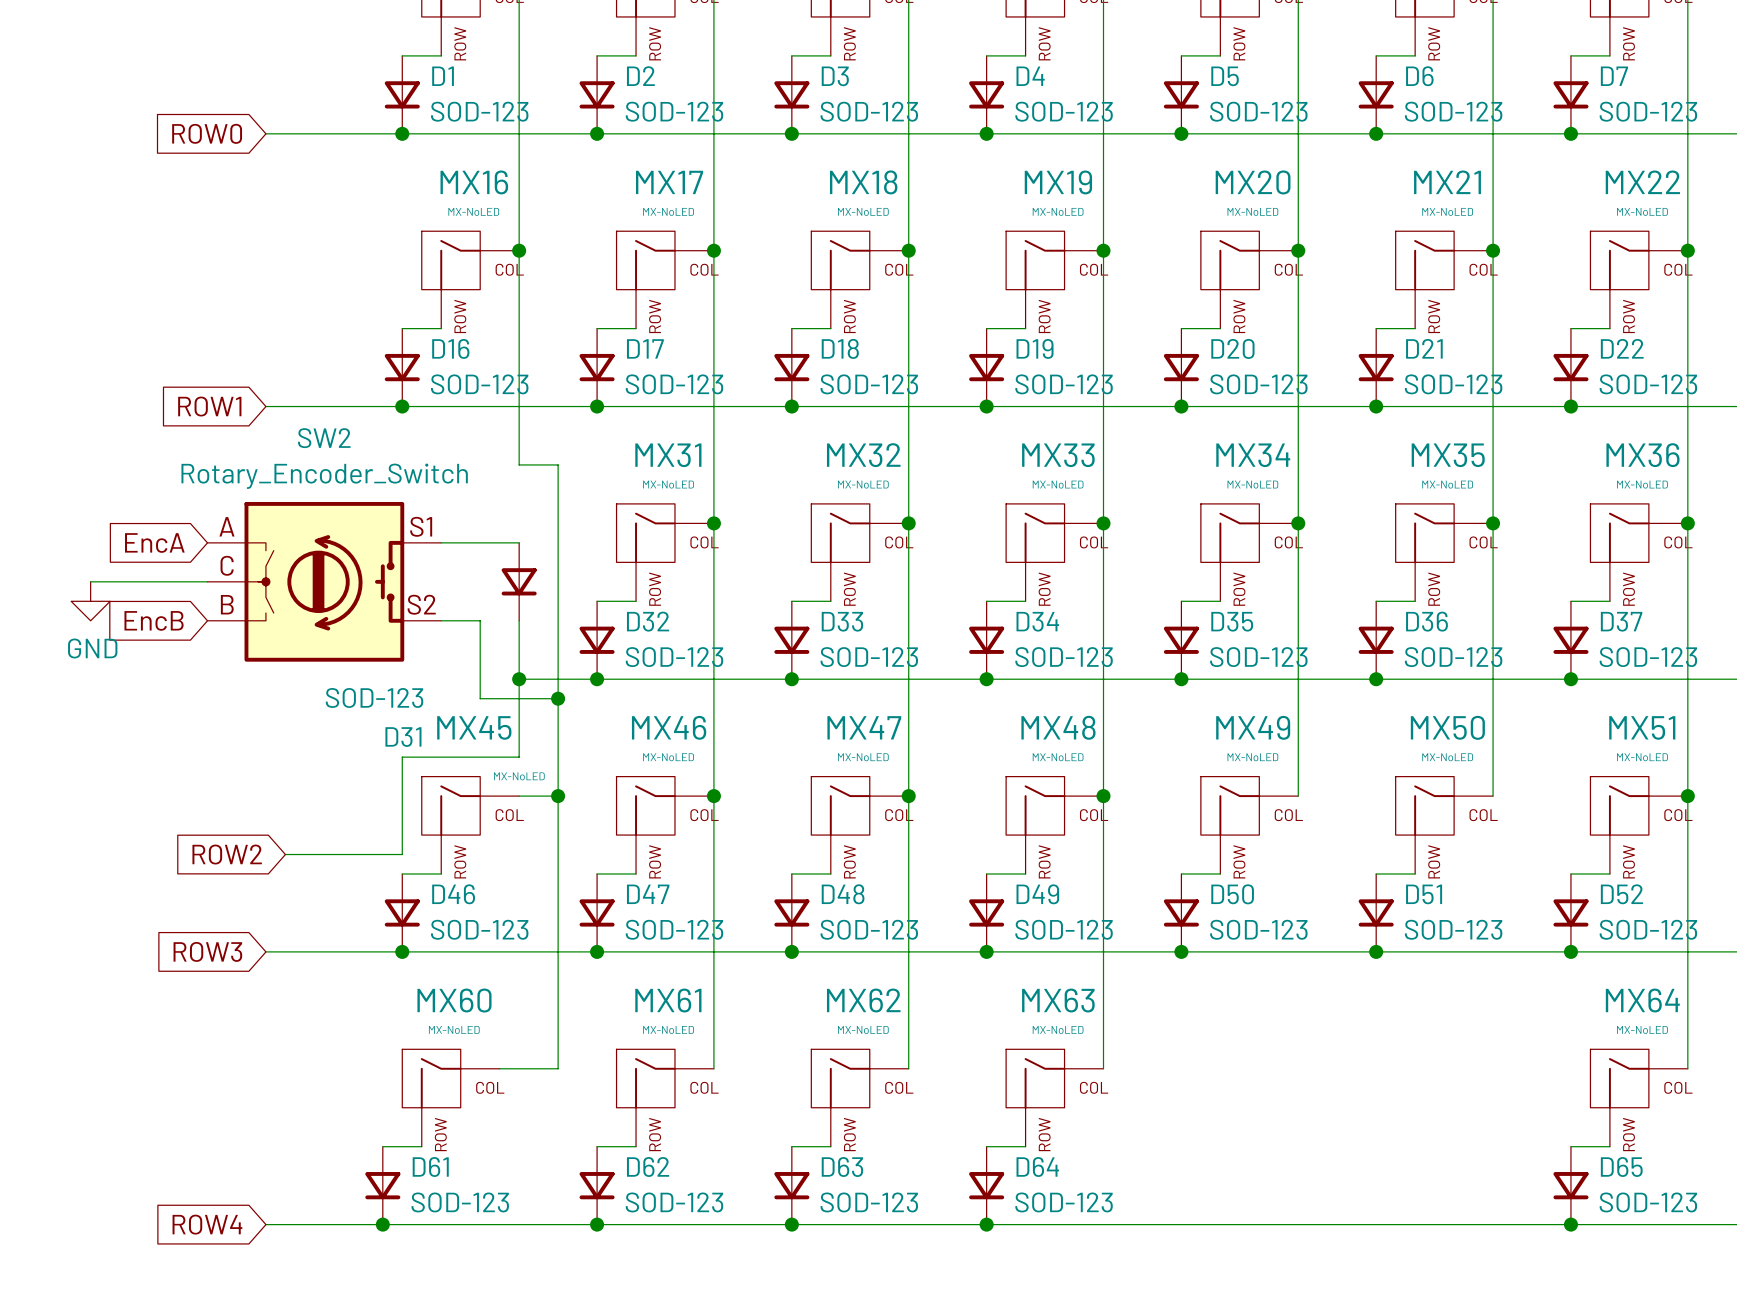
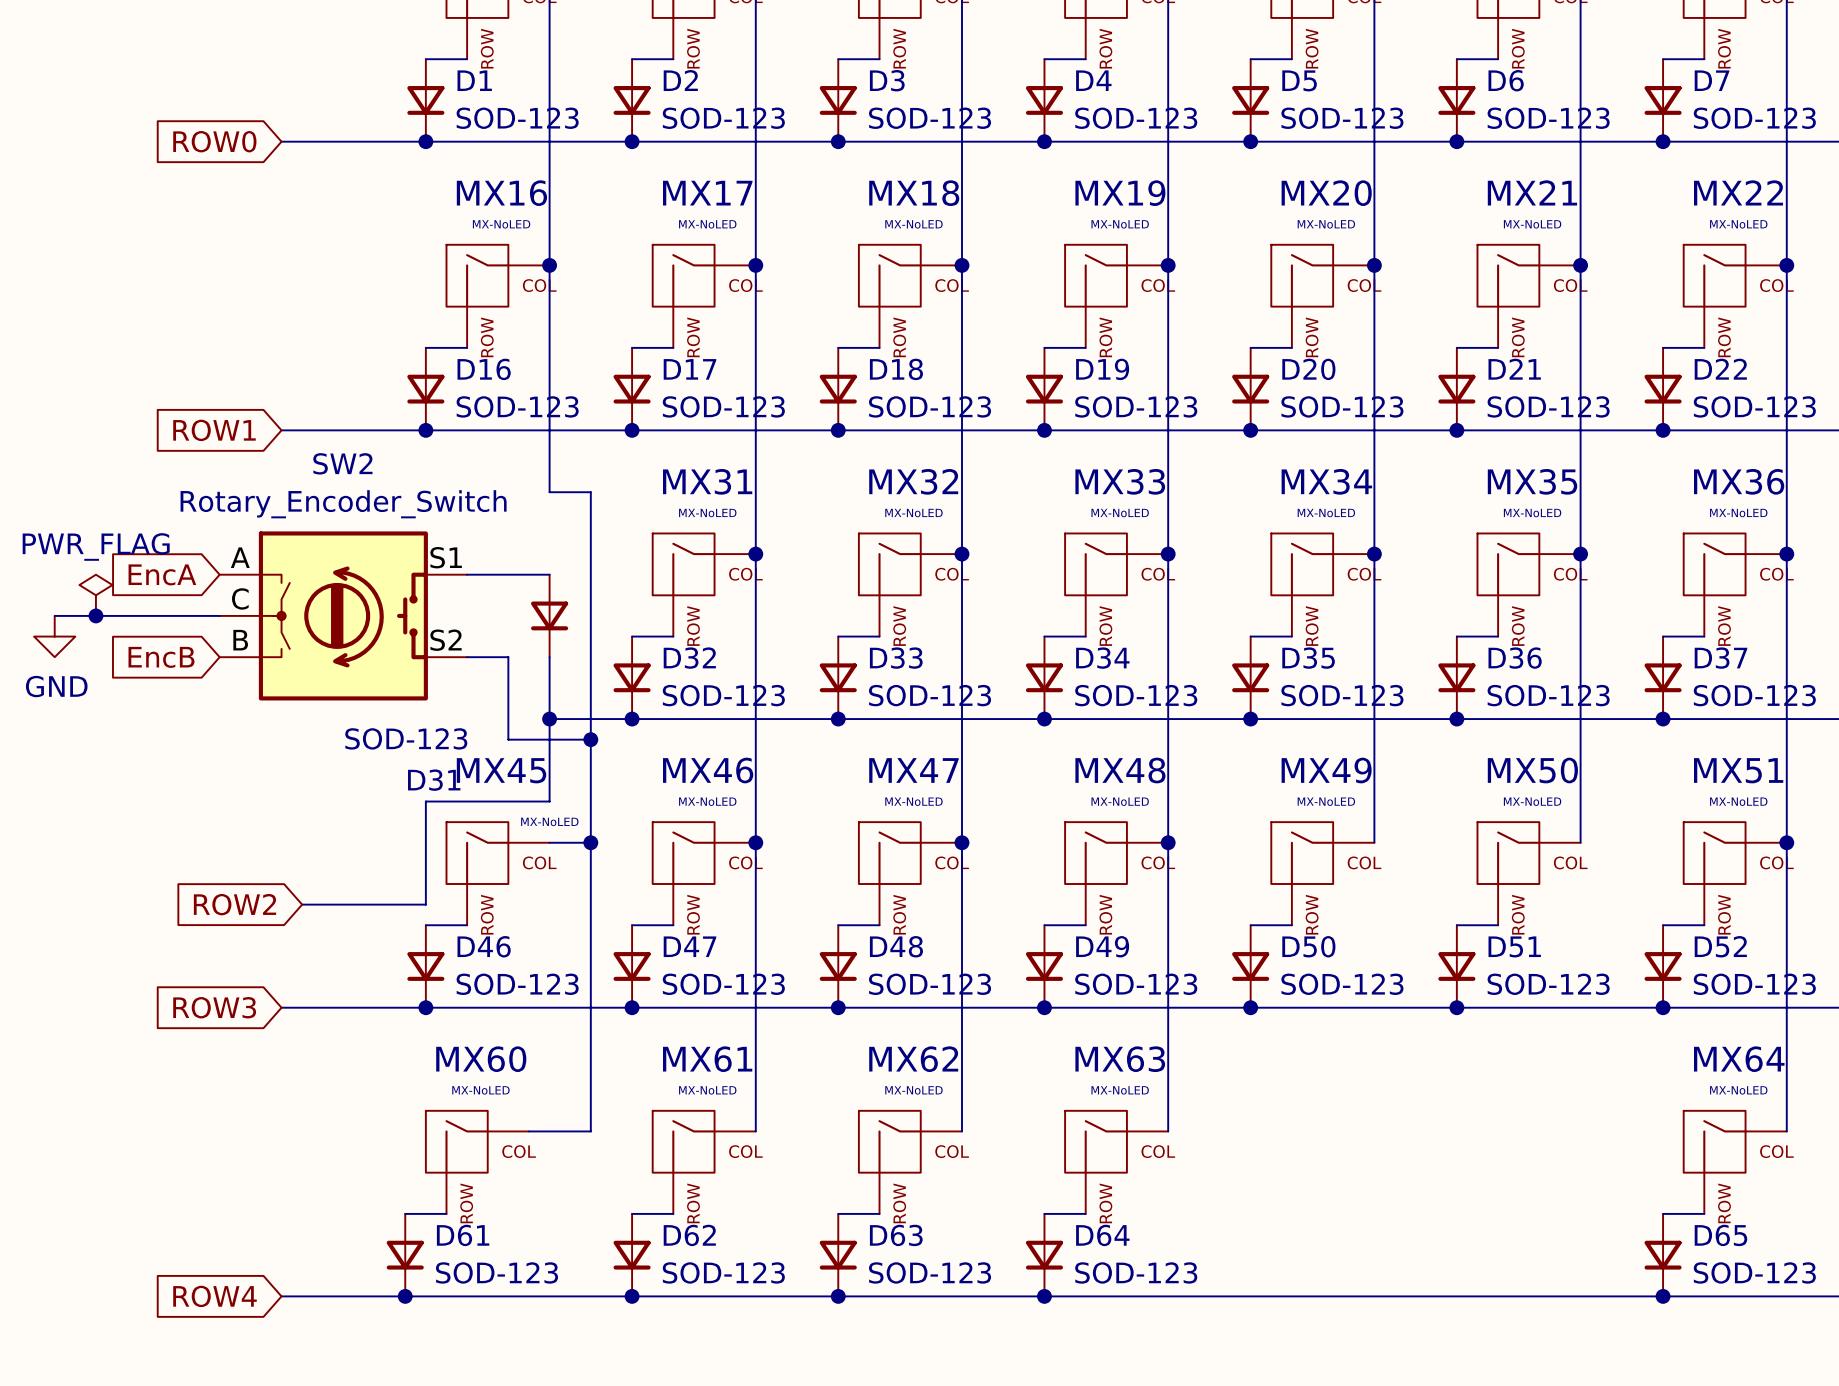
power symbol: none -> PWR_FLAG (95, 595)
wire: none -> (54, 615) (95, 615)
junction: none -> (95, 615)
power symbol position: GND (90, 601) -> GND (54, 636)

